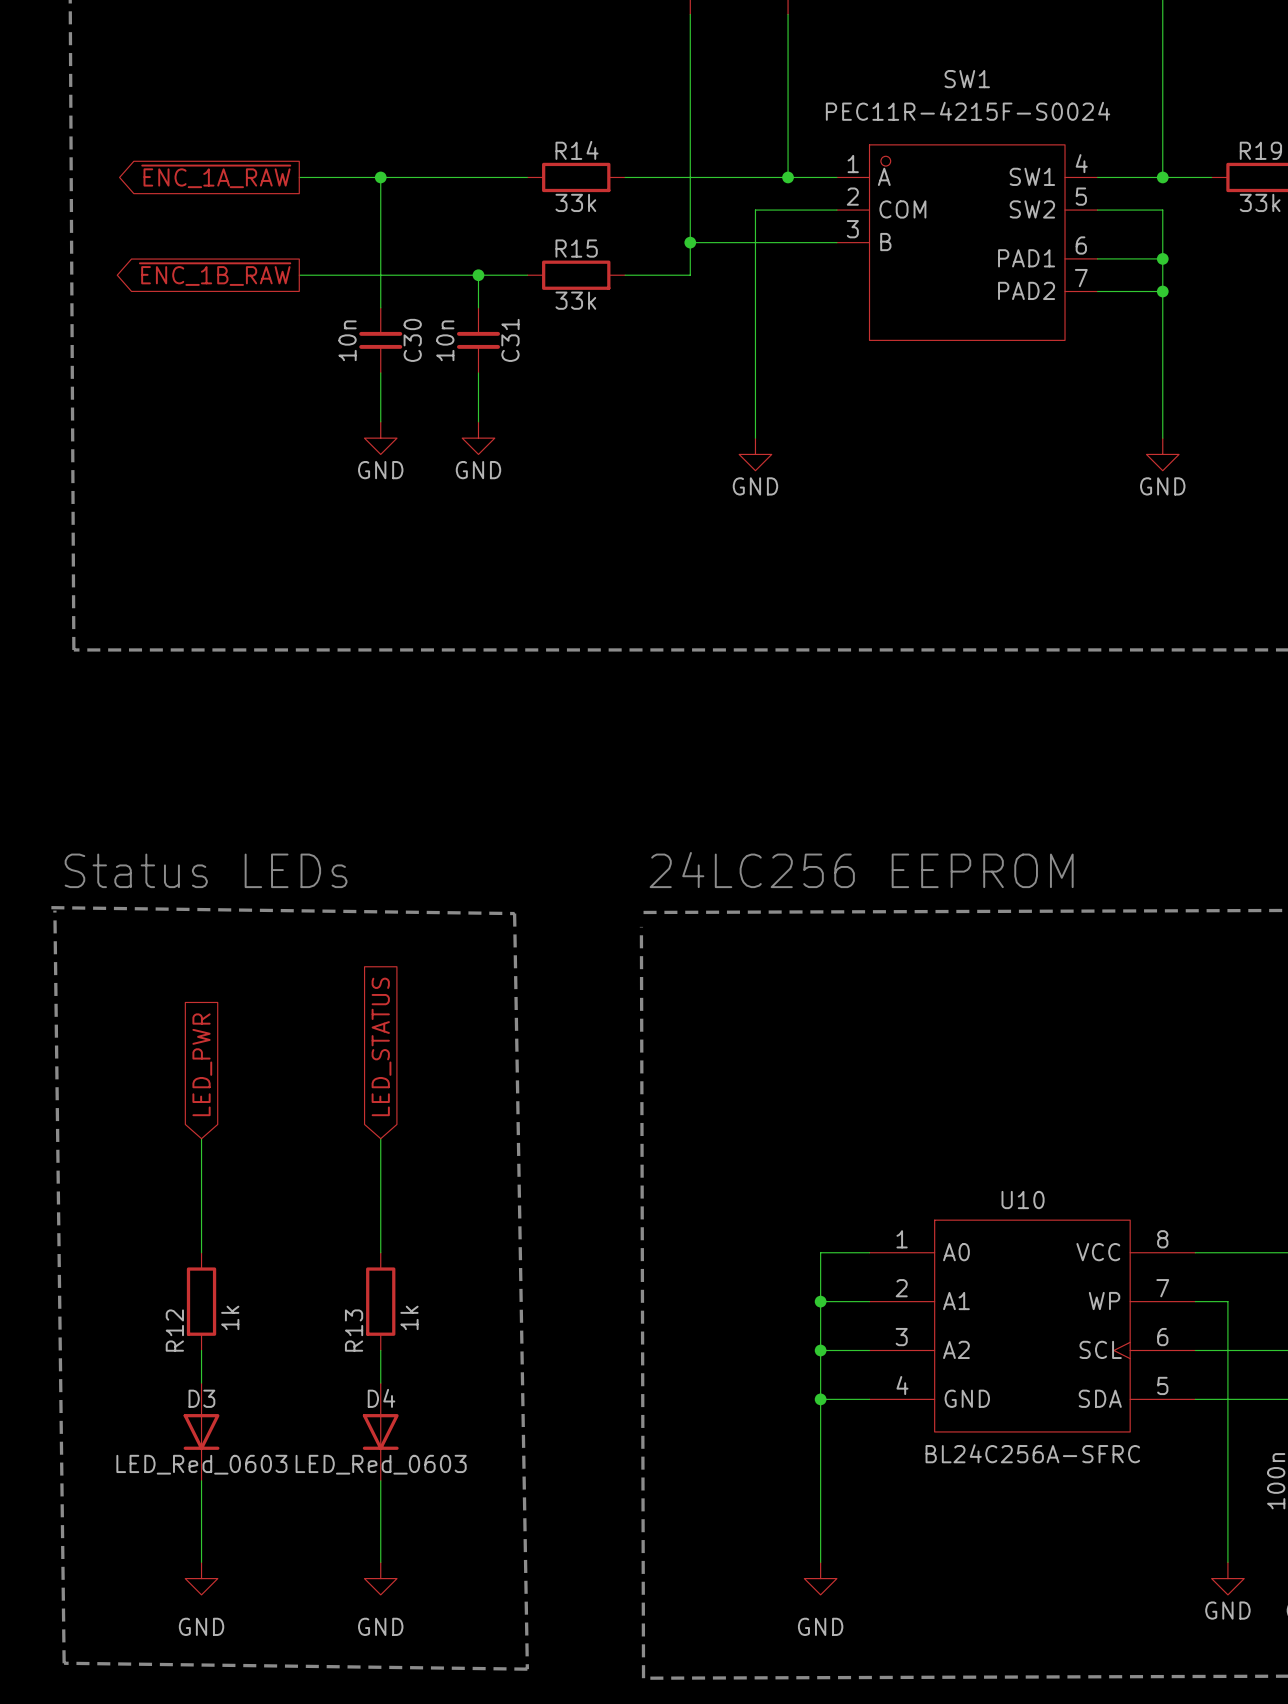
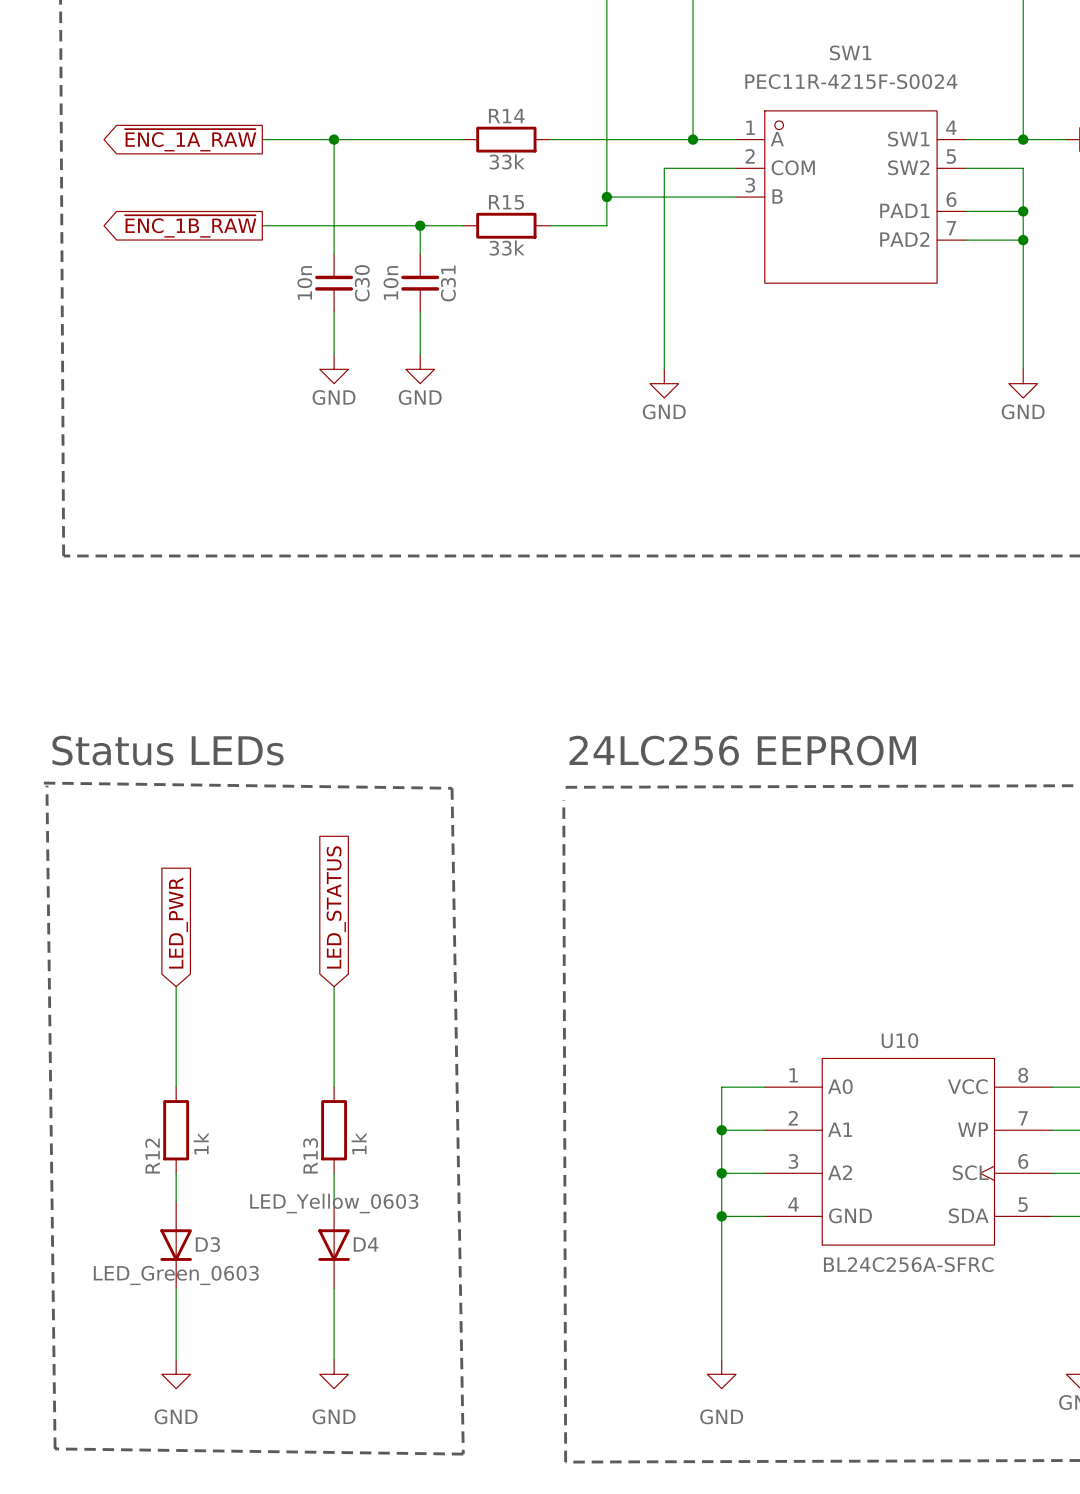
D3 name position: D3 (201, 1398) -> D3 (207, 1244)
D4 name position: D4 (381, 1398) -> D4 (366, 1244)
D3 value: LED_Red_0603 (201, 1464) -> LED_Green_0603 (176, 1275)
D4 value: LED_Red_0603 (381, 1464) -> LED_Yellow_0603 (334, 1203)

